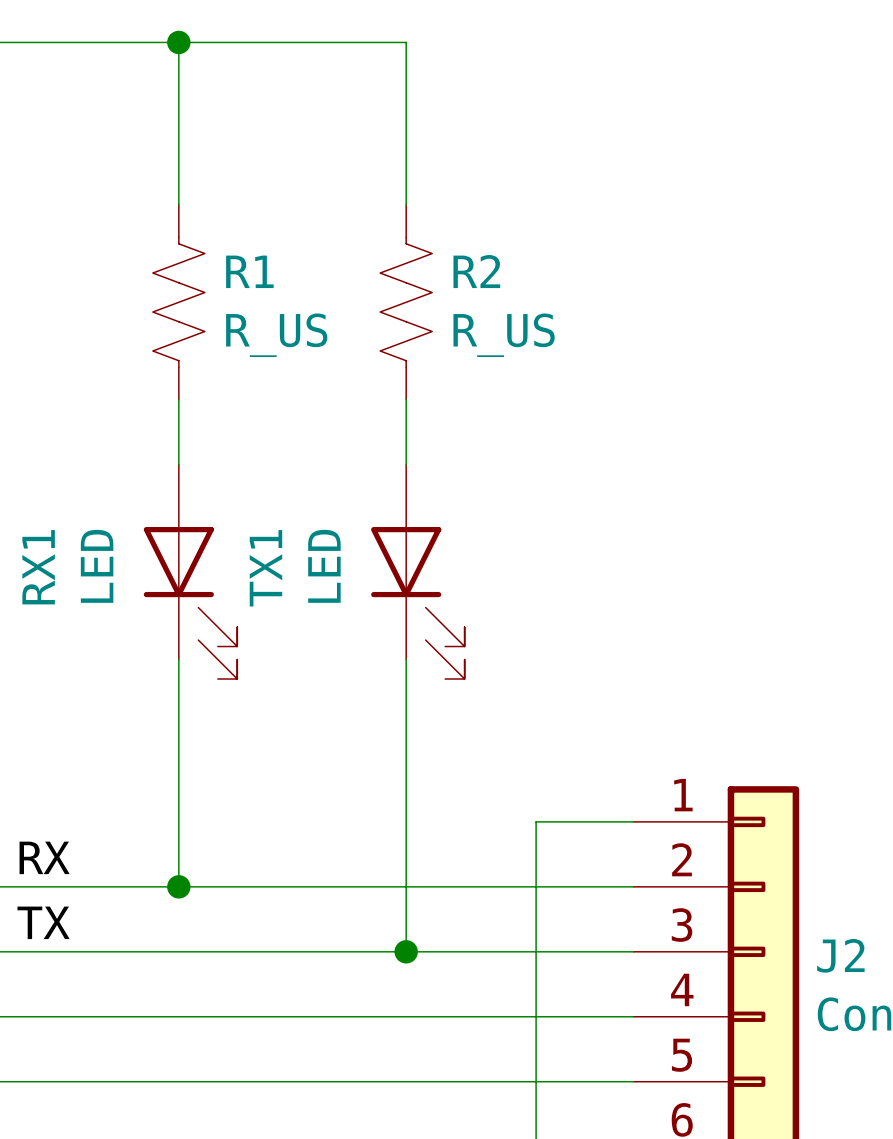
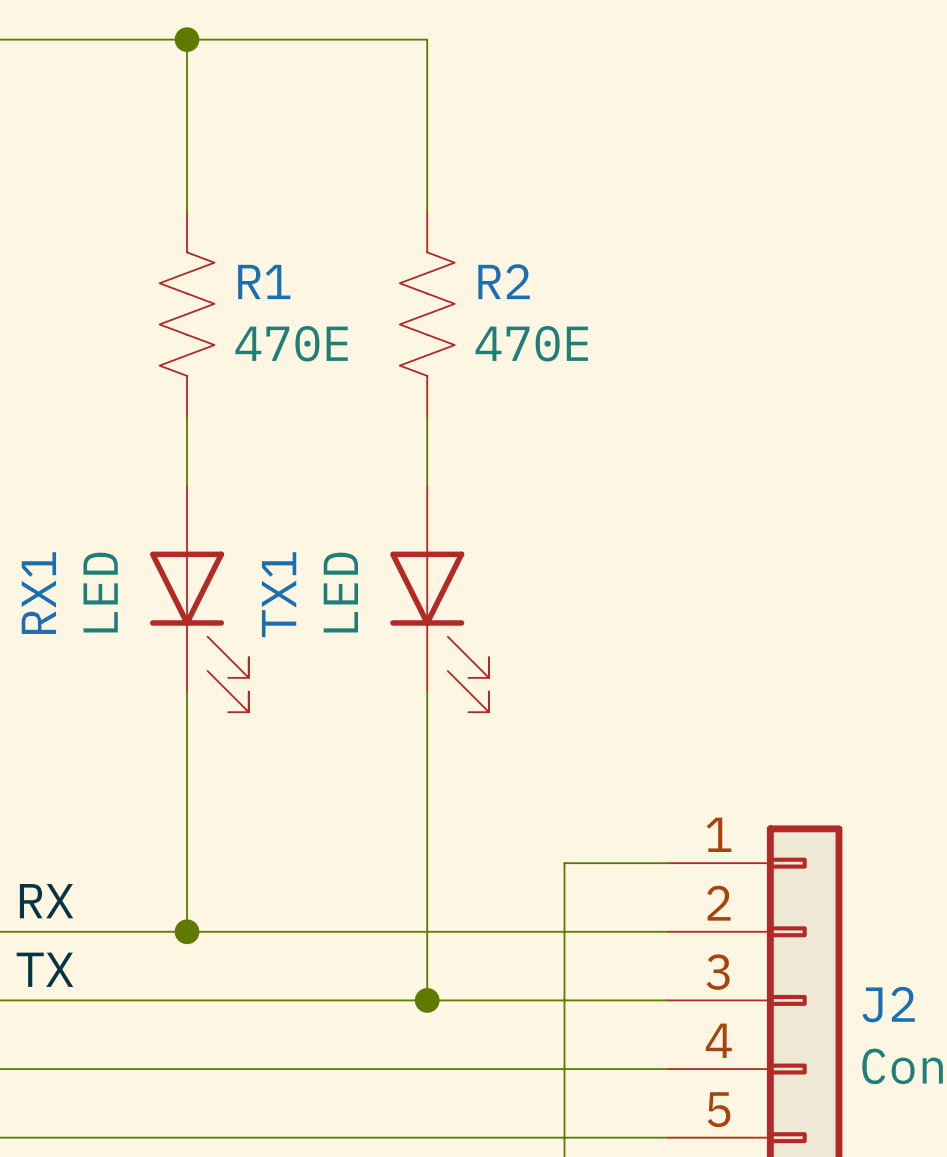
R1 value: R_US (276, 335) -> 470E (291, 343)
R2 value: R_US (504, 335) -> 470E (531, 343)

